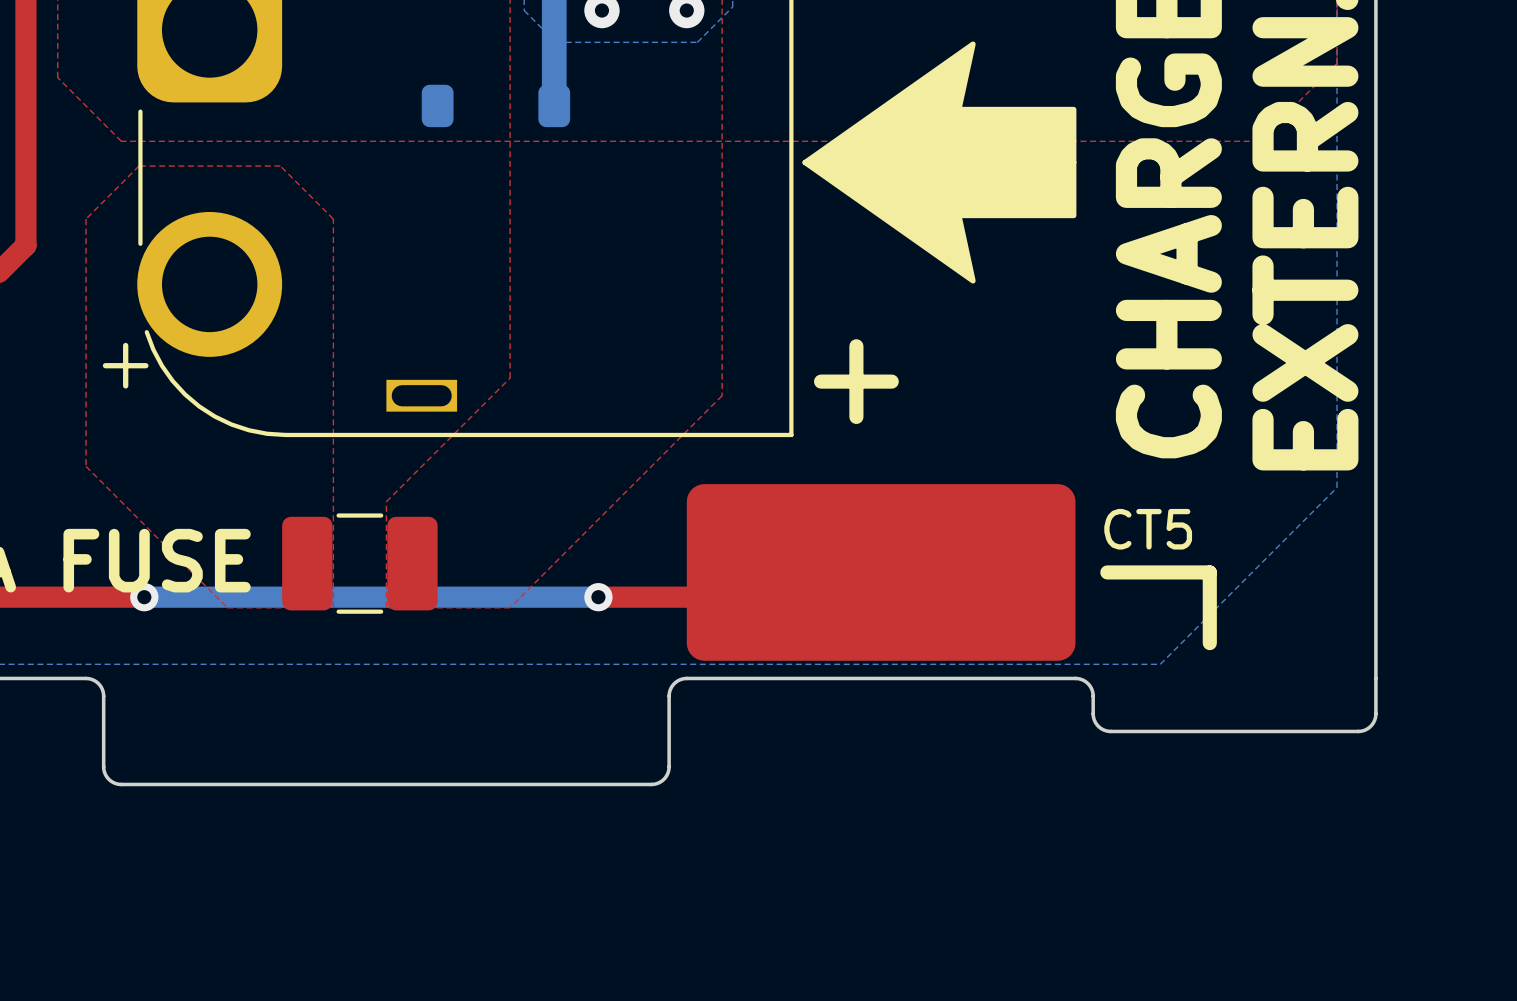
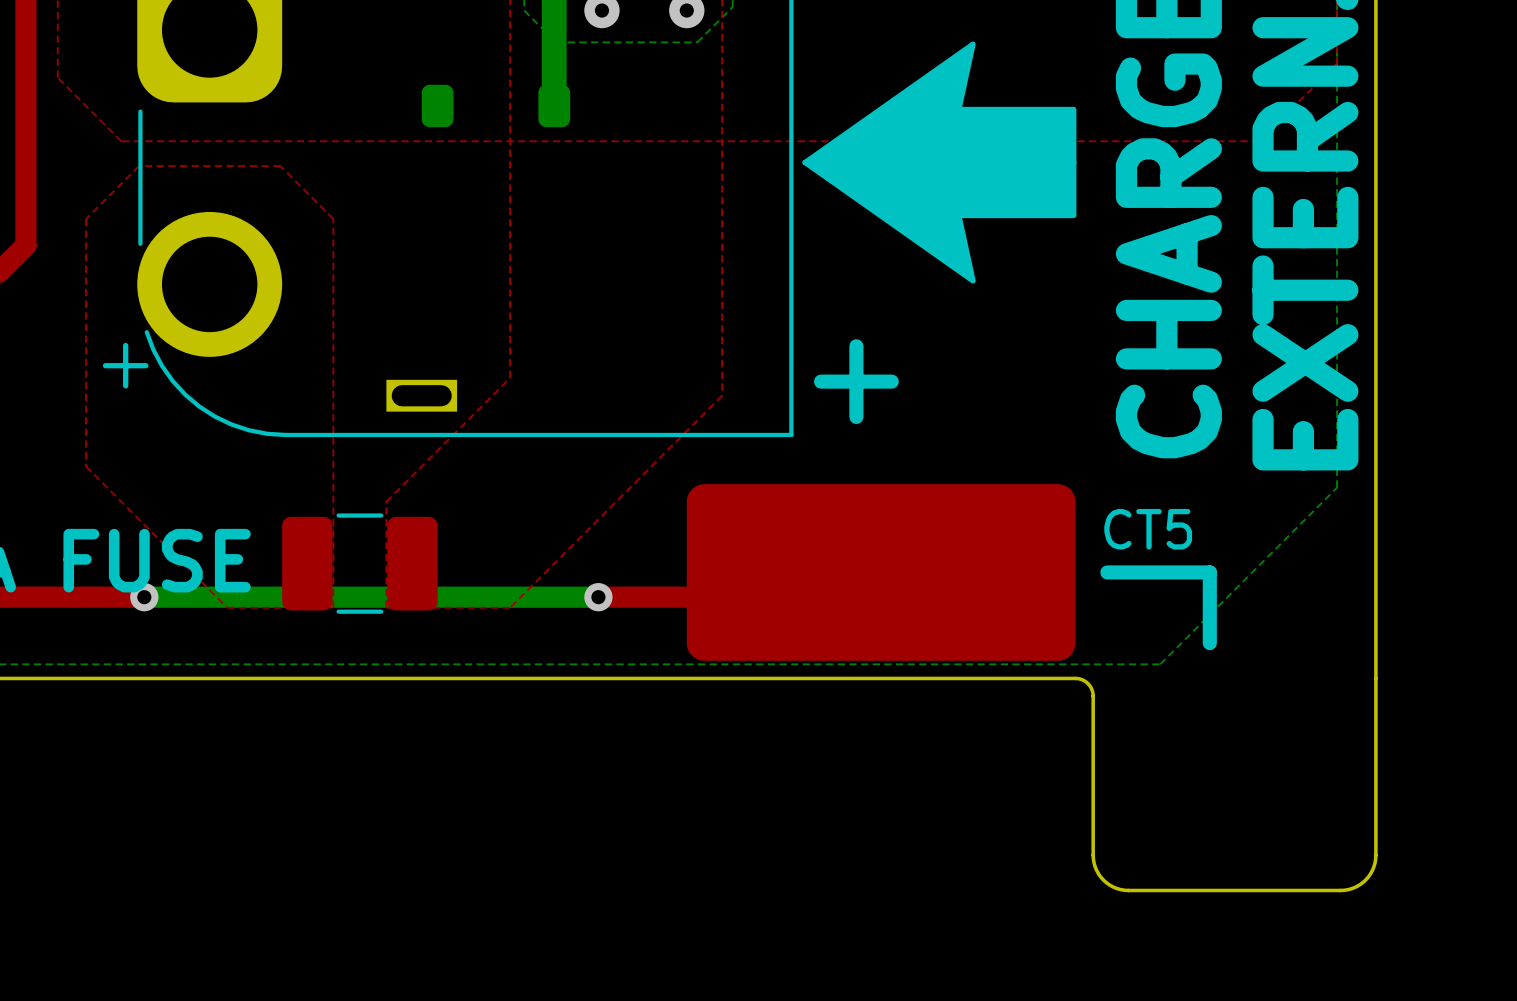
board edge: (86, 678) (96, 682) (103, 691) (103, 768) (108, 779) (117, 784) (651, 784) (662, 780) (668, 771) (669, 693) (674, 683) (686, 678) -> (86, 678) (686, 678)
board edge: (1093, 713) (1098, 726) (1110, 731) (1360, 731) (1370, 726) (1375, 713) -> (1093, 713) (1093, 859) (1096, 870) (1106, 882) (1116, 888) (1128, 890) (1340, 890) (1352, 888) (1362, 882) (1370, 873) (1375, 863) (1375, 713)

